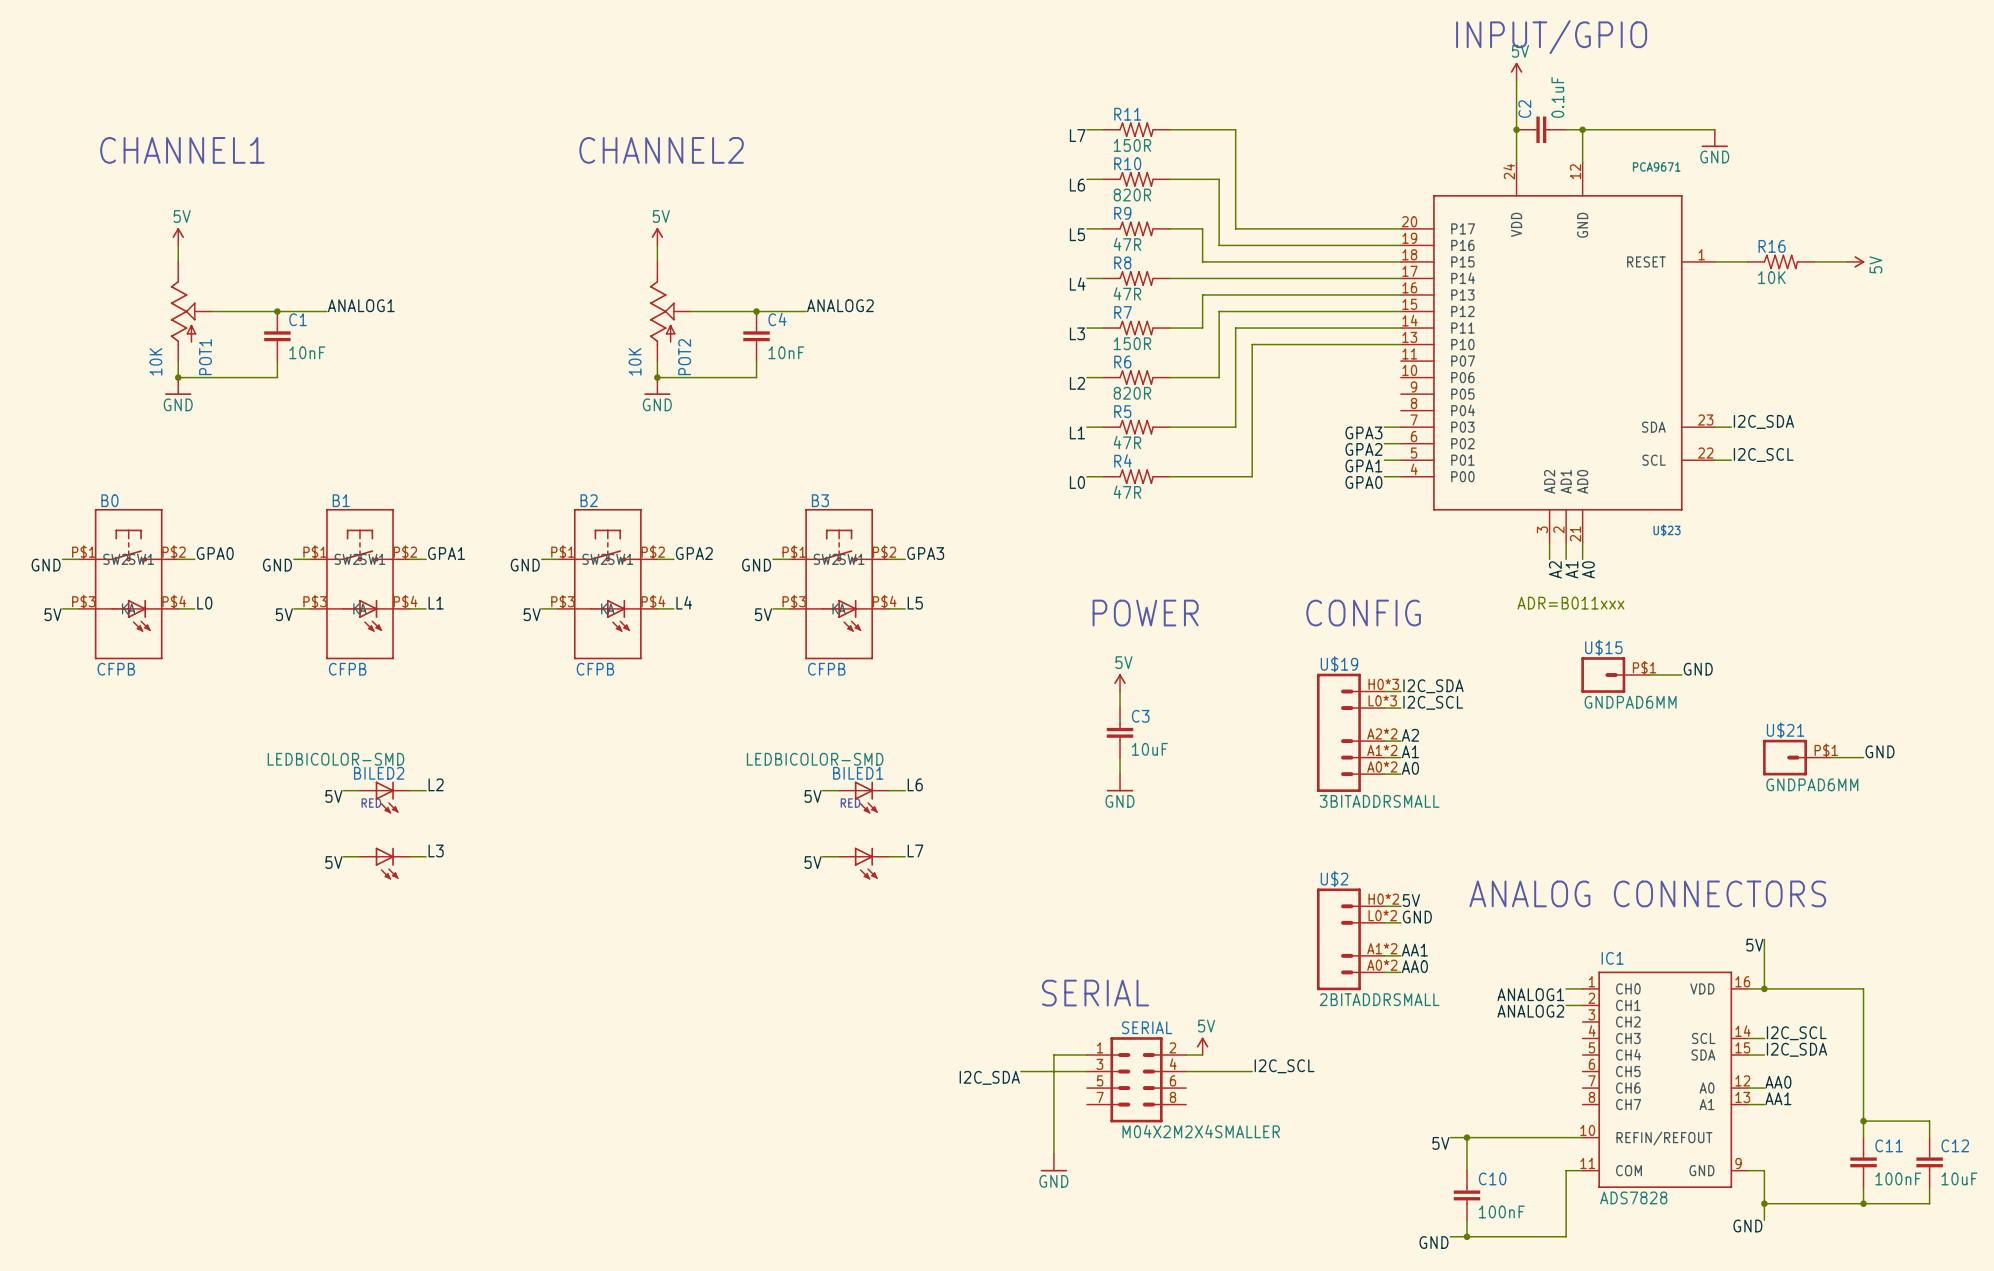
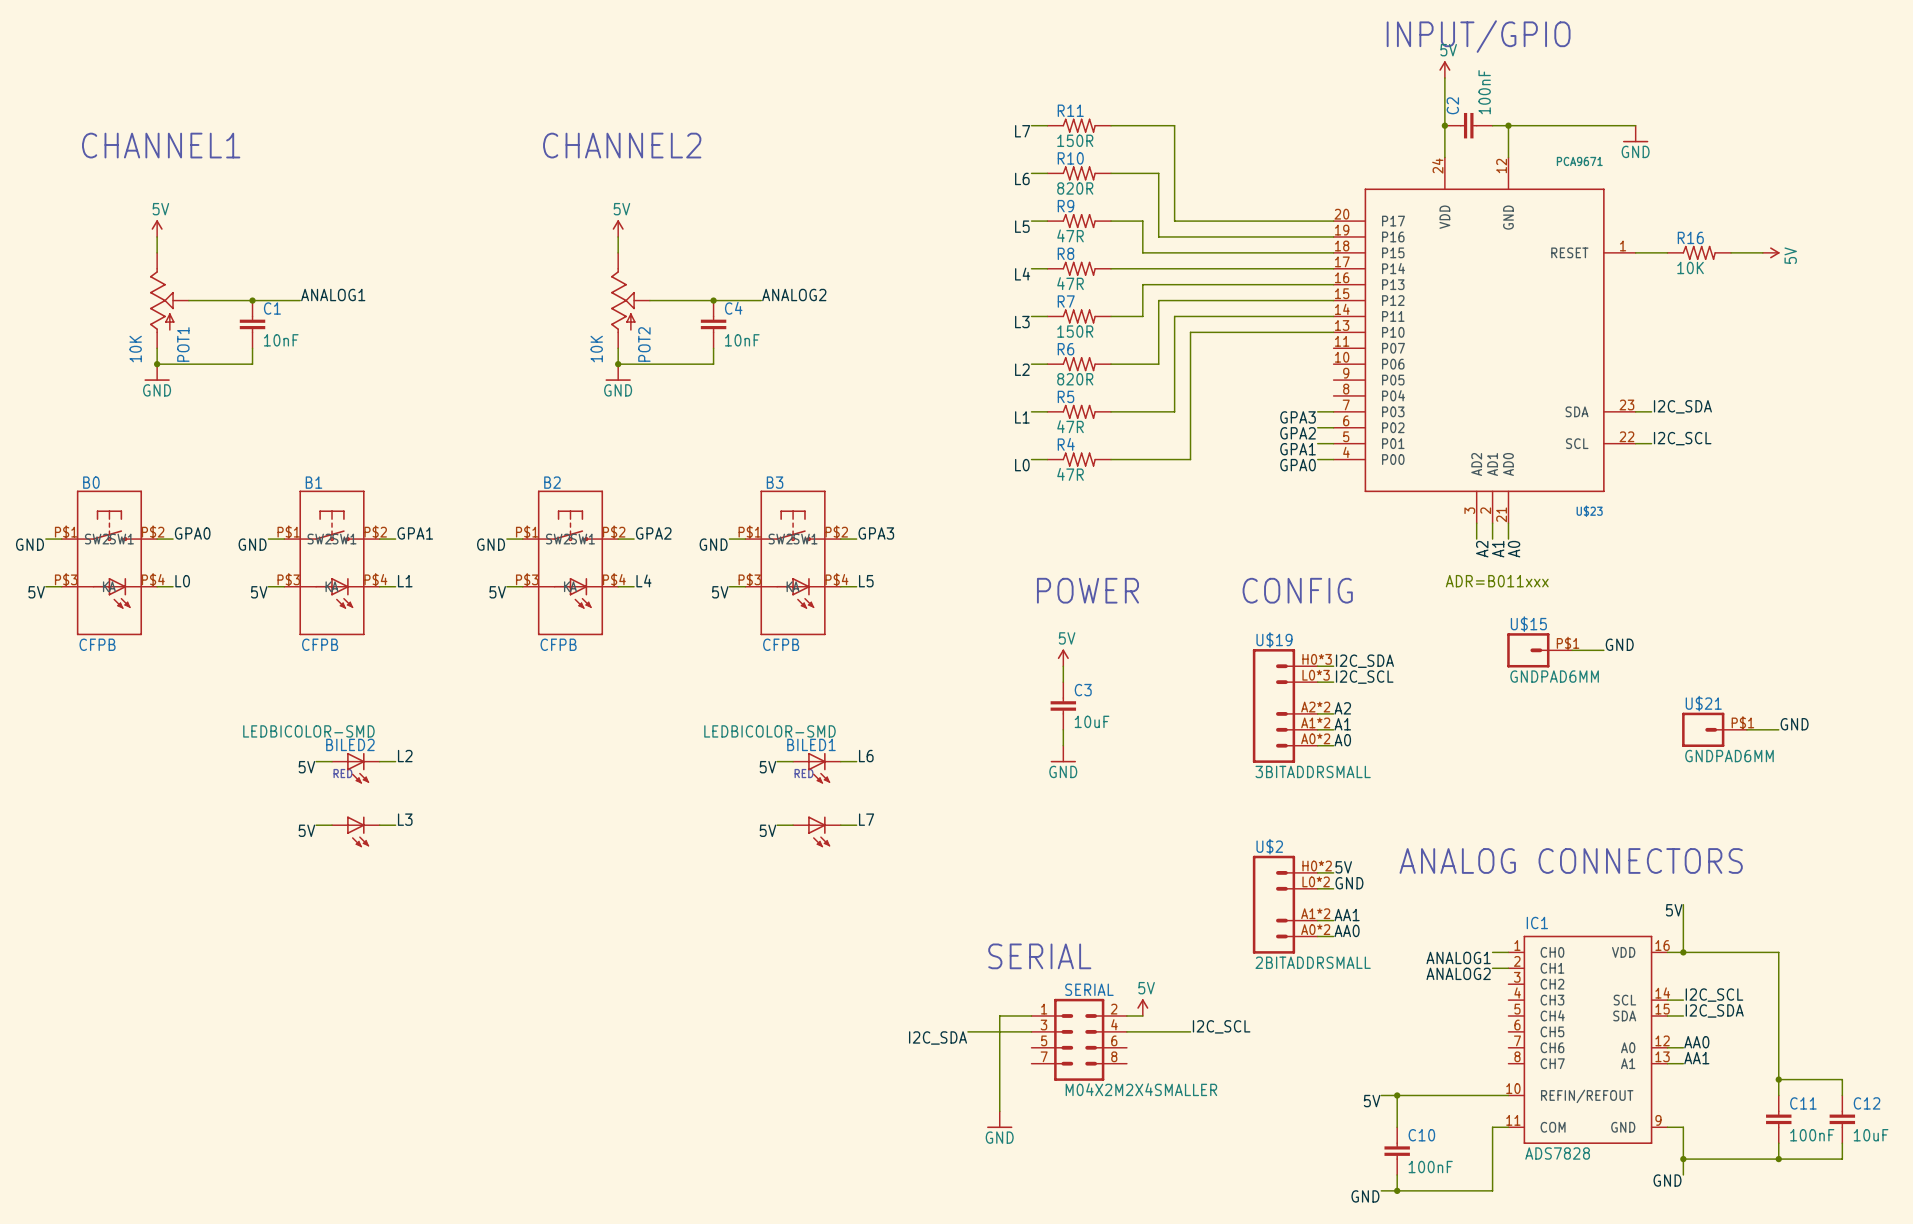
C2 value: 0.1uF (1557, 97) -> 100nF (1484, 92)

